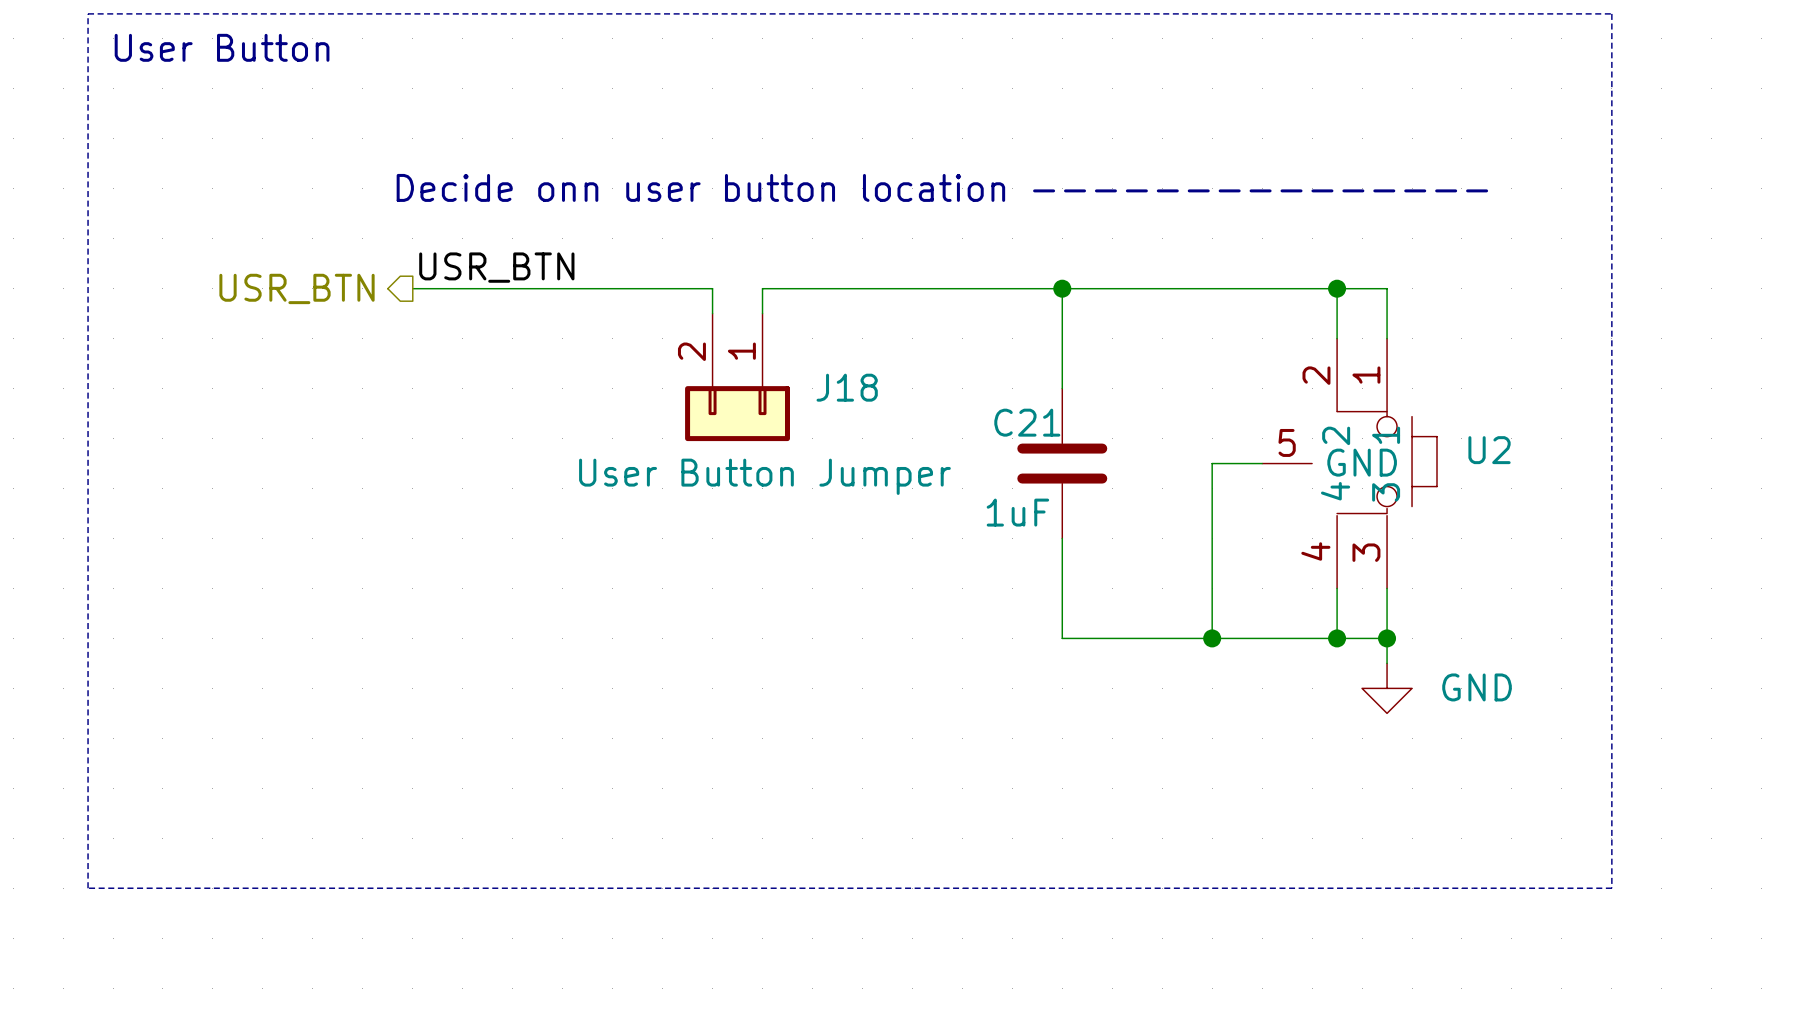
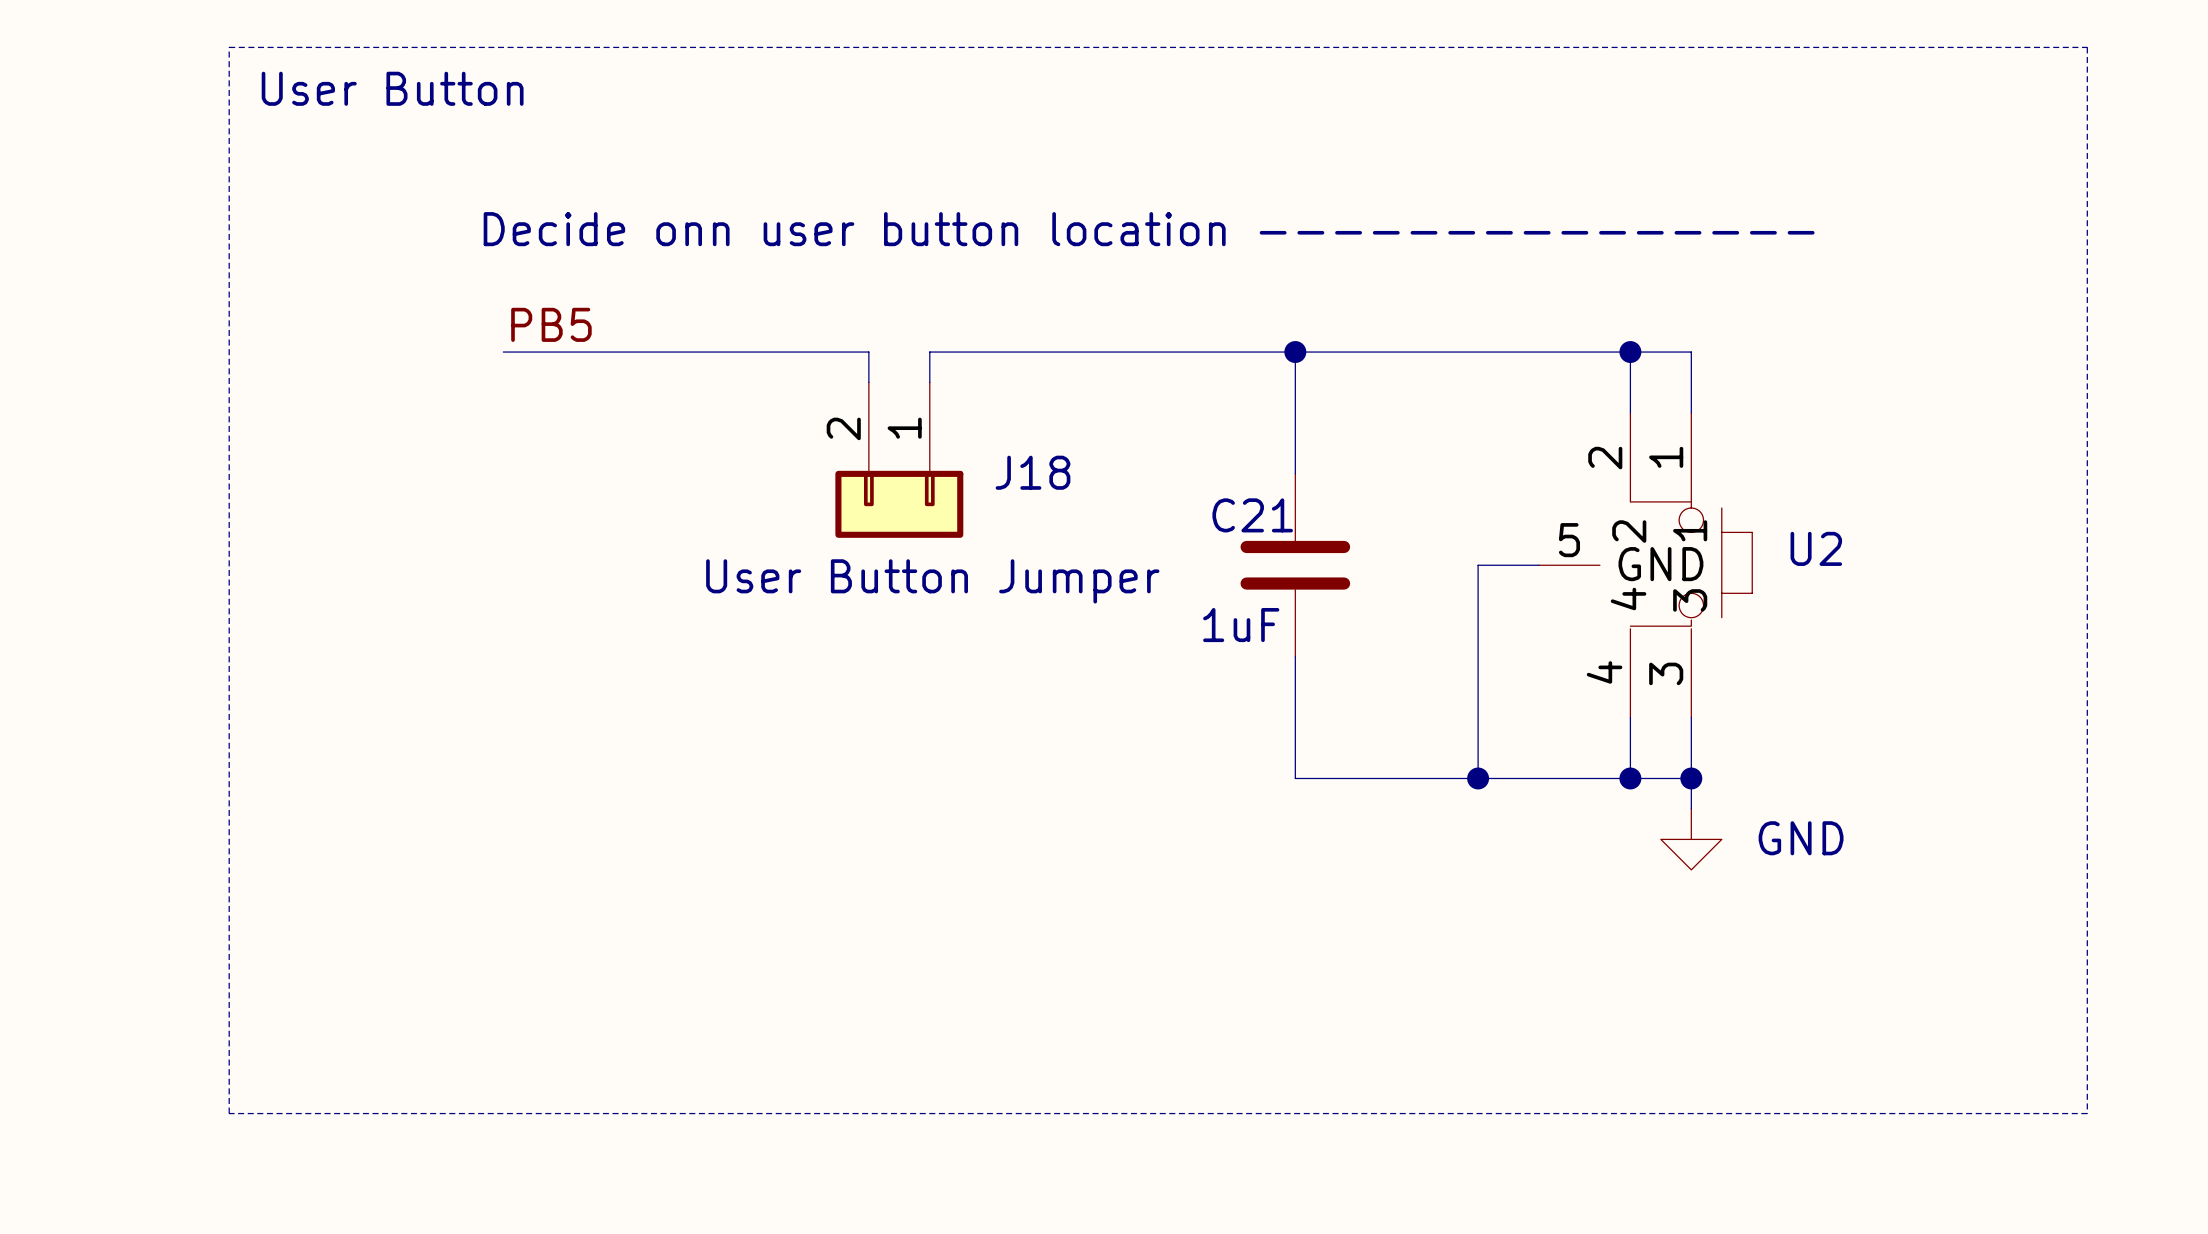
line: (88, 13) (1611, 13) (1611, 888) (88, 888) (88, 13) -> (229, 47) (229, 1113) (2087, 1113) (2087, 47) (229, 47)
text position: User Button (222, 47) -> User Button (392, 88)
label: USR_BTN (496, 267) -> PB5 (551, 324)
hierarchical label: USR_BTN (297, 288) -> none

